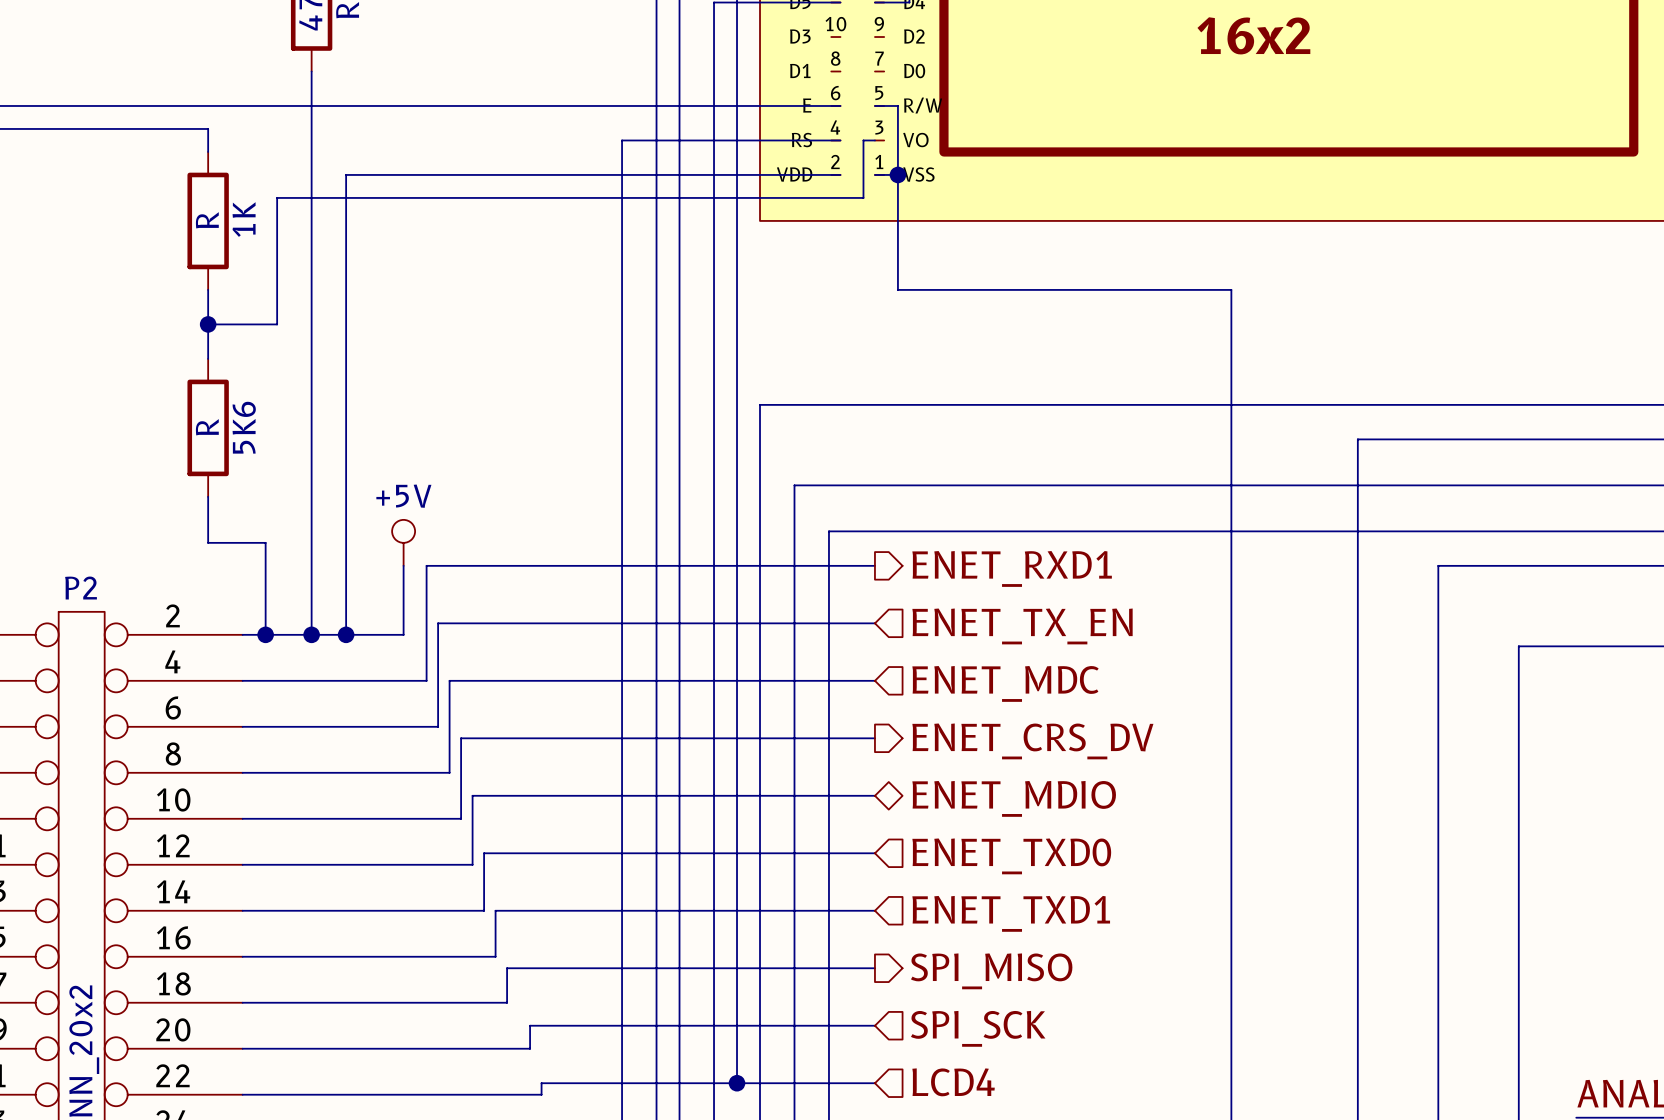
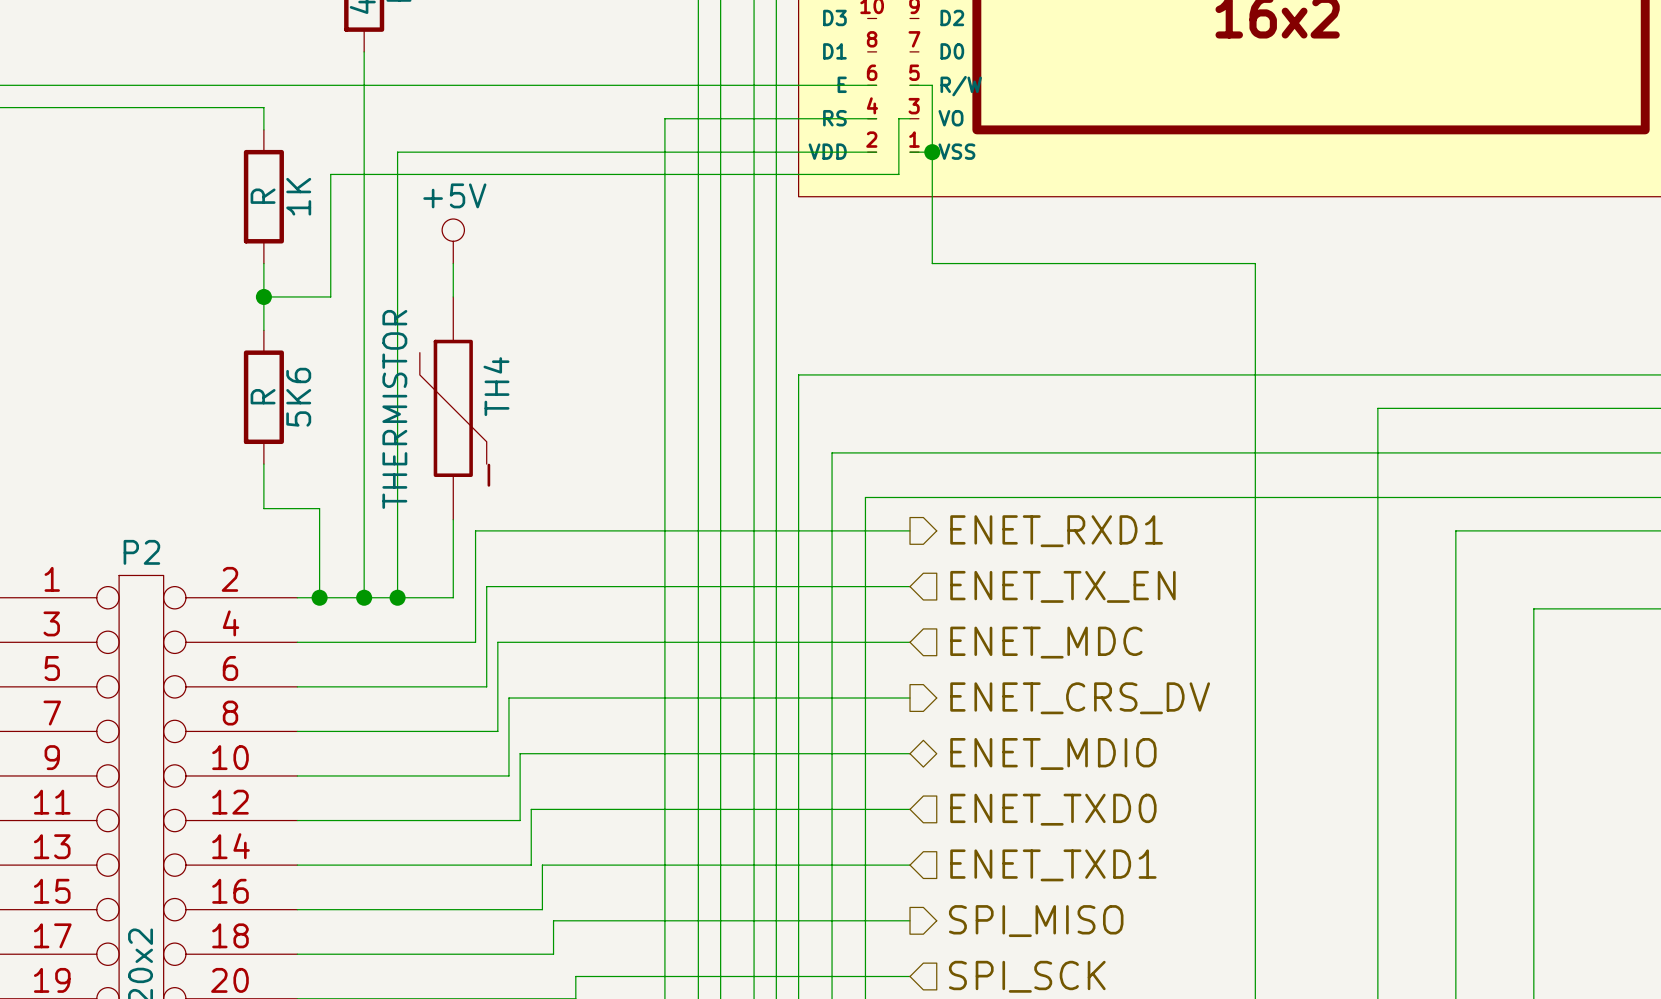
wire: none -> (453, 263) (453, 296)
TH4: none -> THERMISTOR (453, 408)
+5V position: (403, 542) -> (453, 241)

